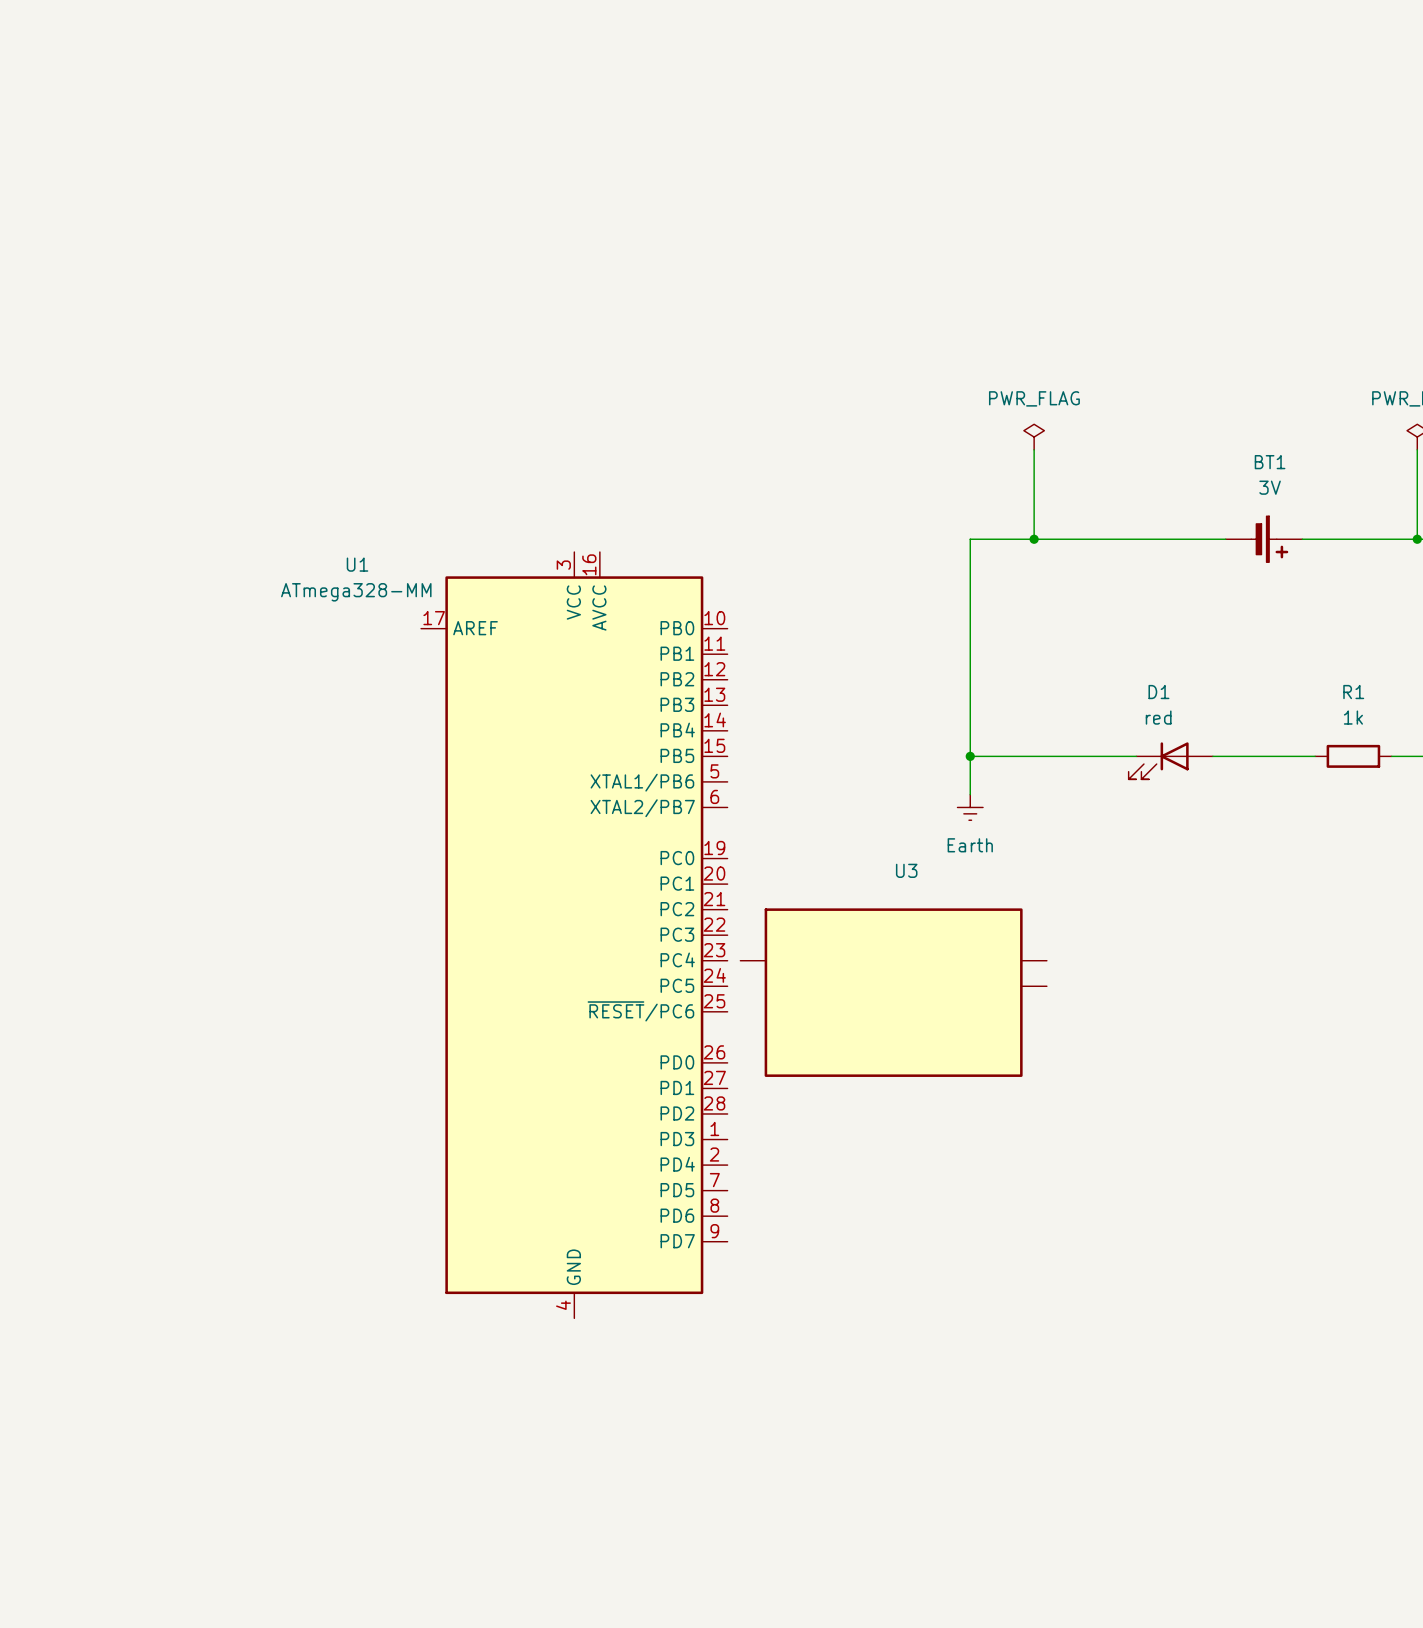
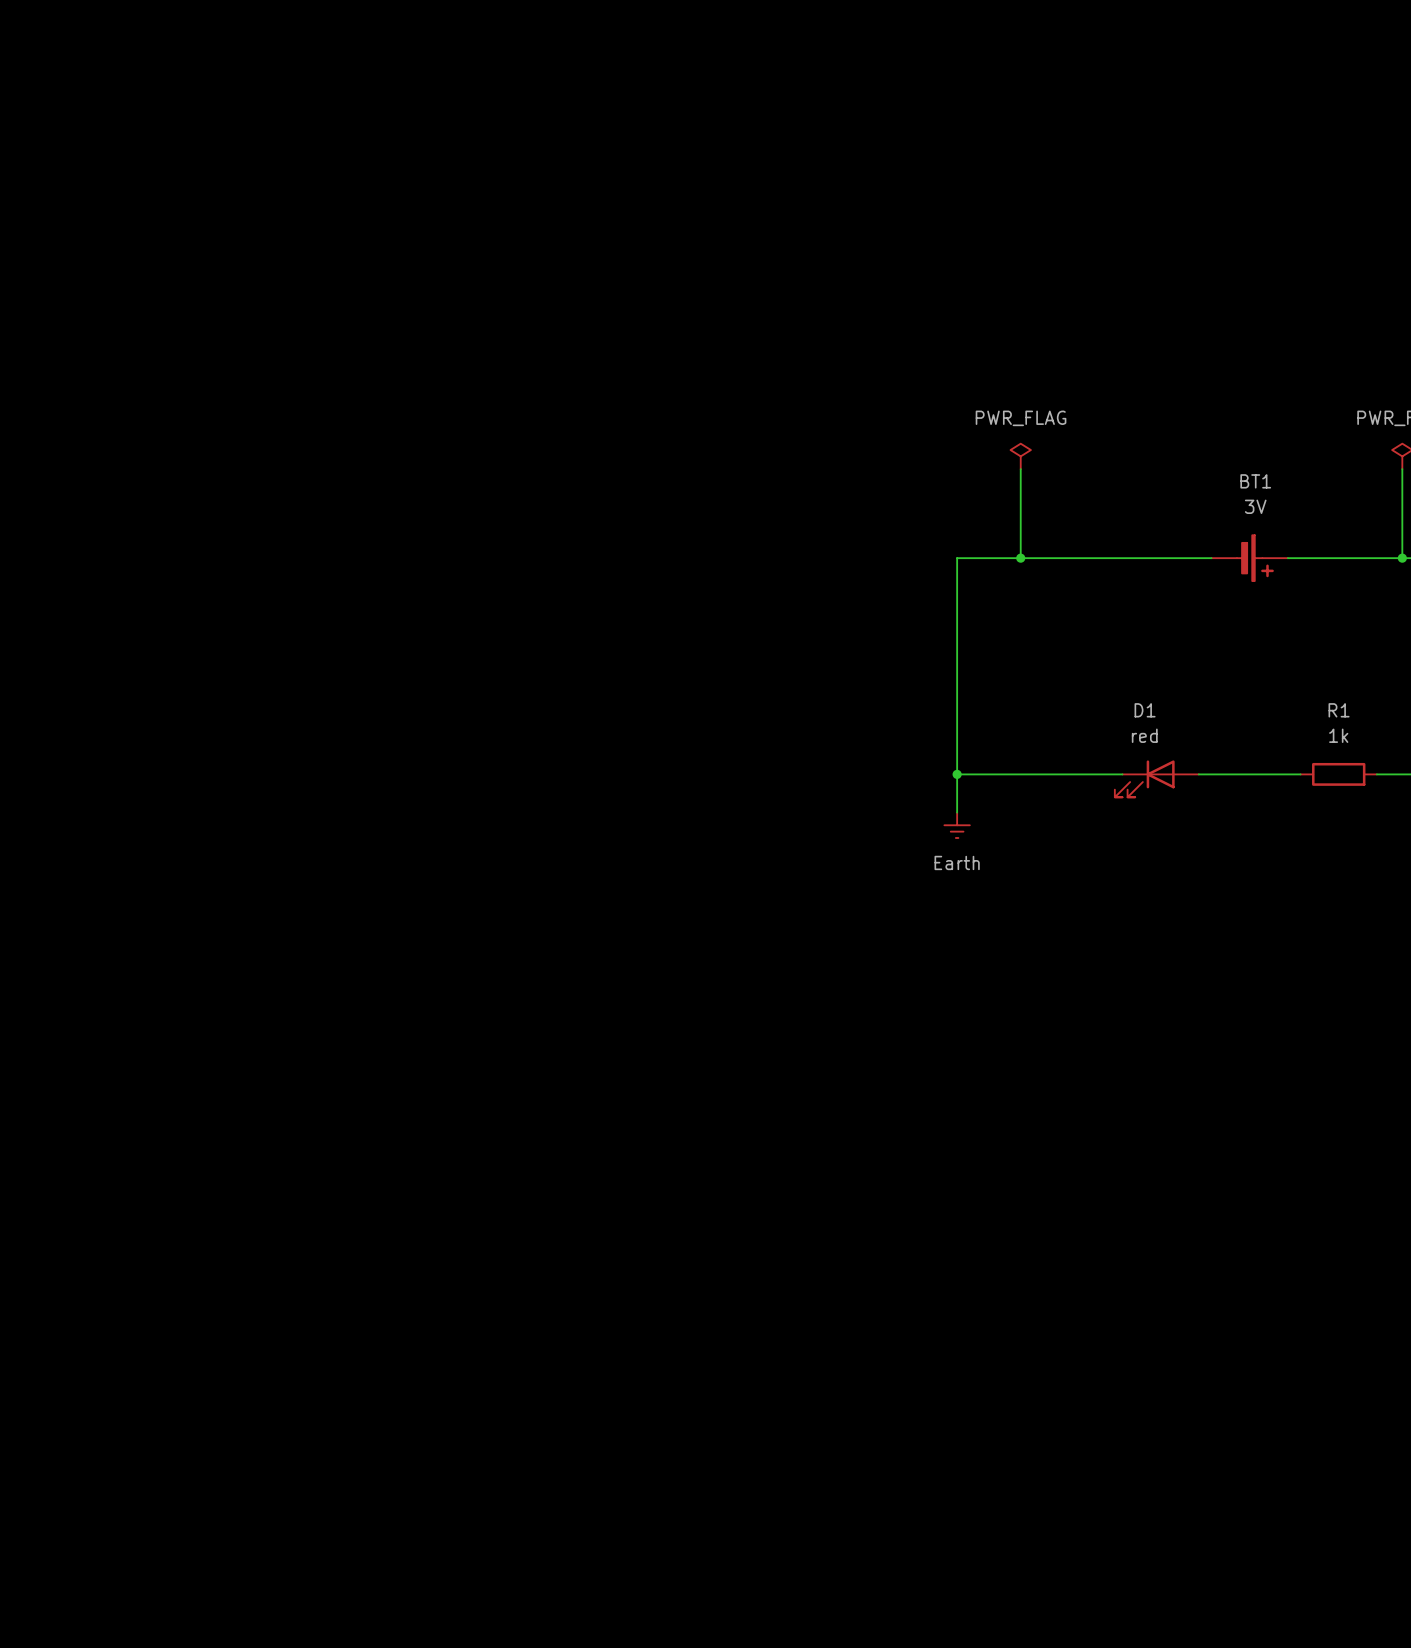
U1: ATmega328-MM (574, 935) -> none
U3: (893, 992) -> none

